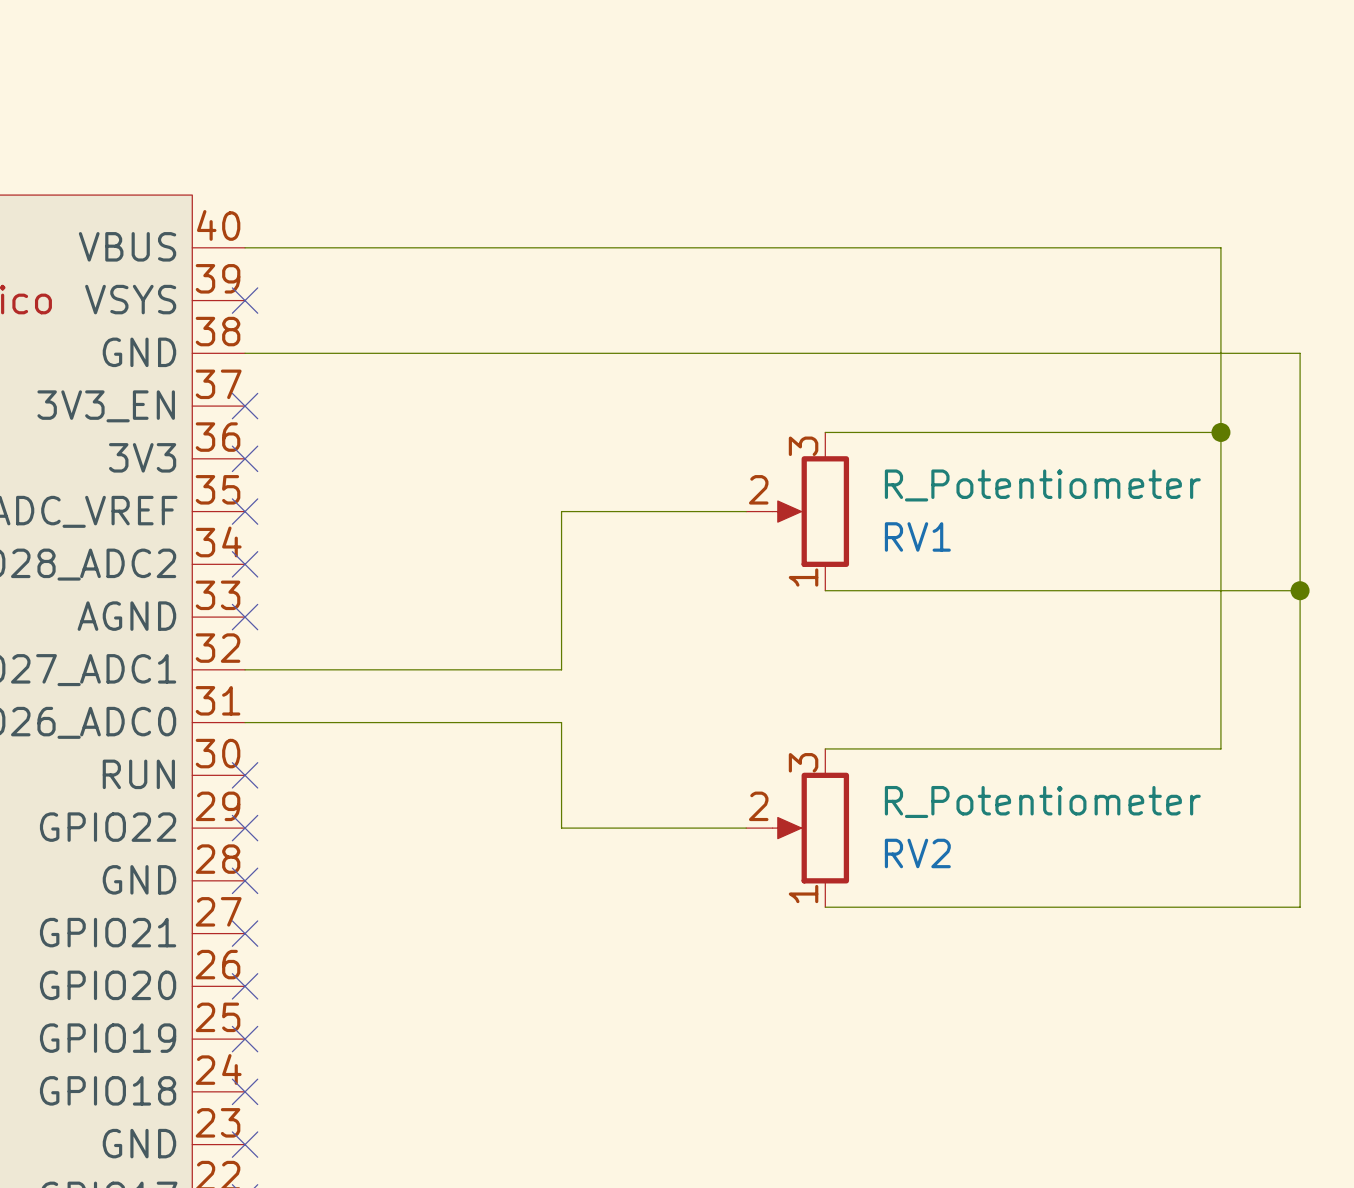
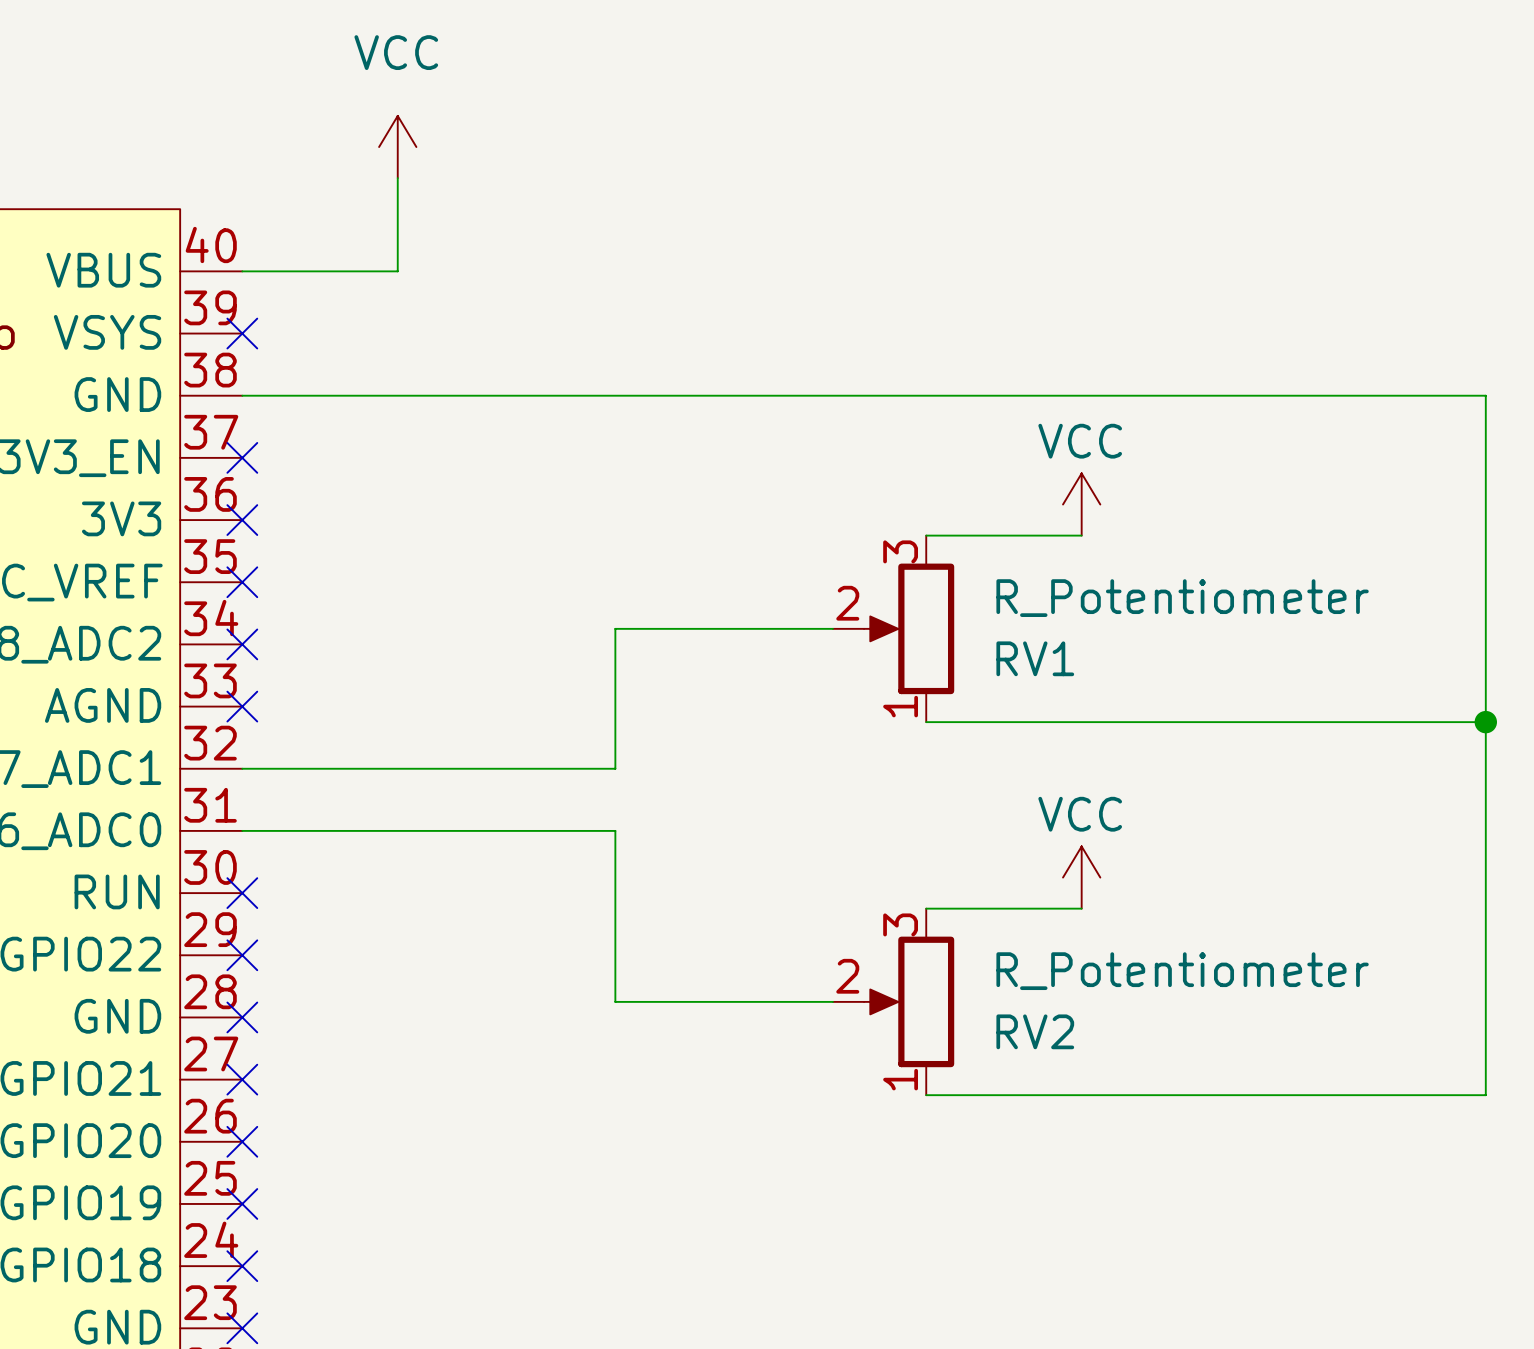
power symbol: none -> VCC (397, 147)
wire: (376, 247) (1220, 247) (1220, 748) (825, 748) -> (397, 271) (397, 178)
wire: (825, 432) (1220, 432) -> none
junction: (1220, 432) -> none
power symbol: none -> VCC (1081, 504)
wire: none -> (926, 535) (1081, 535)
wire: (746, 511) (561, 511) (561, 551) -> (832, 628) (615, 628)
RV1 position: (797, 511) -> (893, 628)
wire: (825, 590) (1300, 590) -> (926, 722) (1485, 722)
junction position: (1300, 590) -> (1485, 722)
power symbol: none -> VCC (1081, 877)
wire: none -> (926, 908) (1081, 908)
wire: (561, 828) (746, 828) -> (615, 955) (615, 1001) (832, 1001)
RV2 position: (797, 828) -> (893, 1001)
wire: (825, 907) (1300, 907) -> (926, 1095) (1485, 1095) (1485, 1048)

